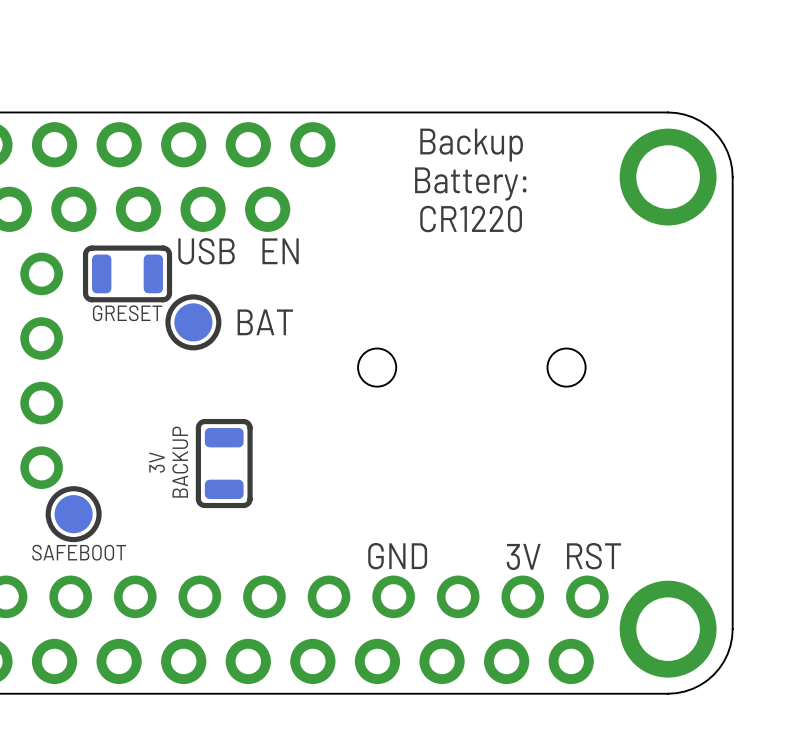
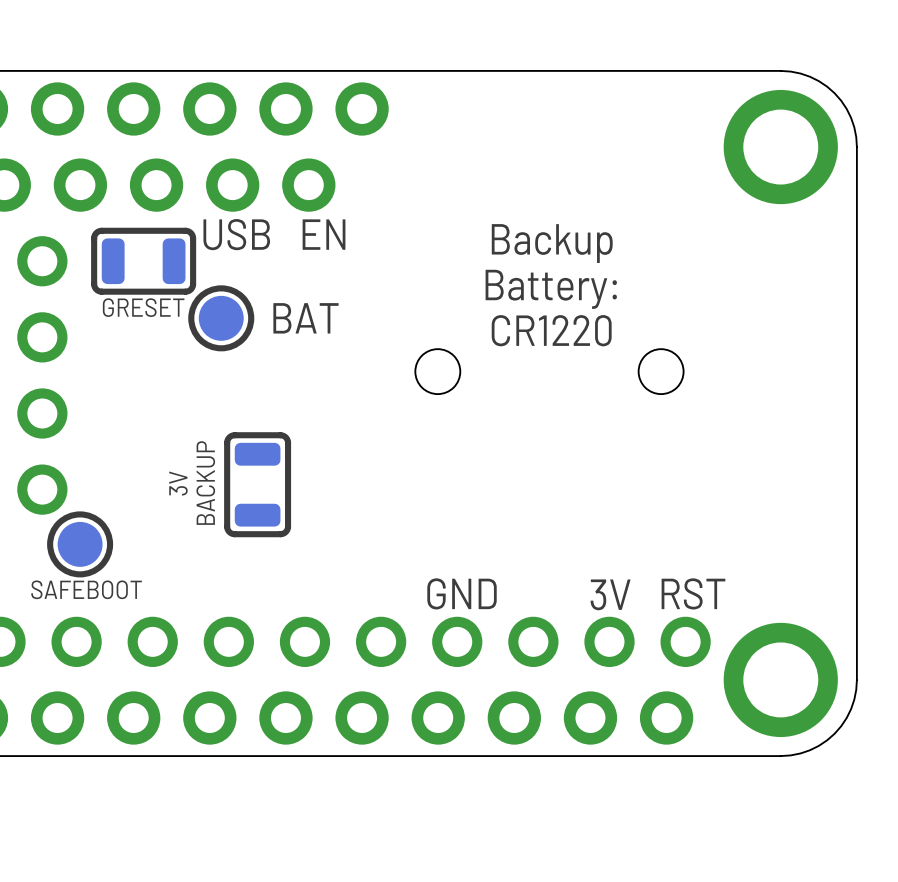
text position: Backup (471, 145) -> Backup (552, 243)
text position: Battery: (470, 183) -> Battery: (551, 289)
text position: CR1220 (471, 219) -> CR1220 (551, 330)

